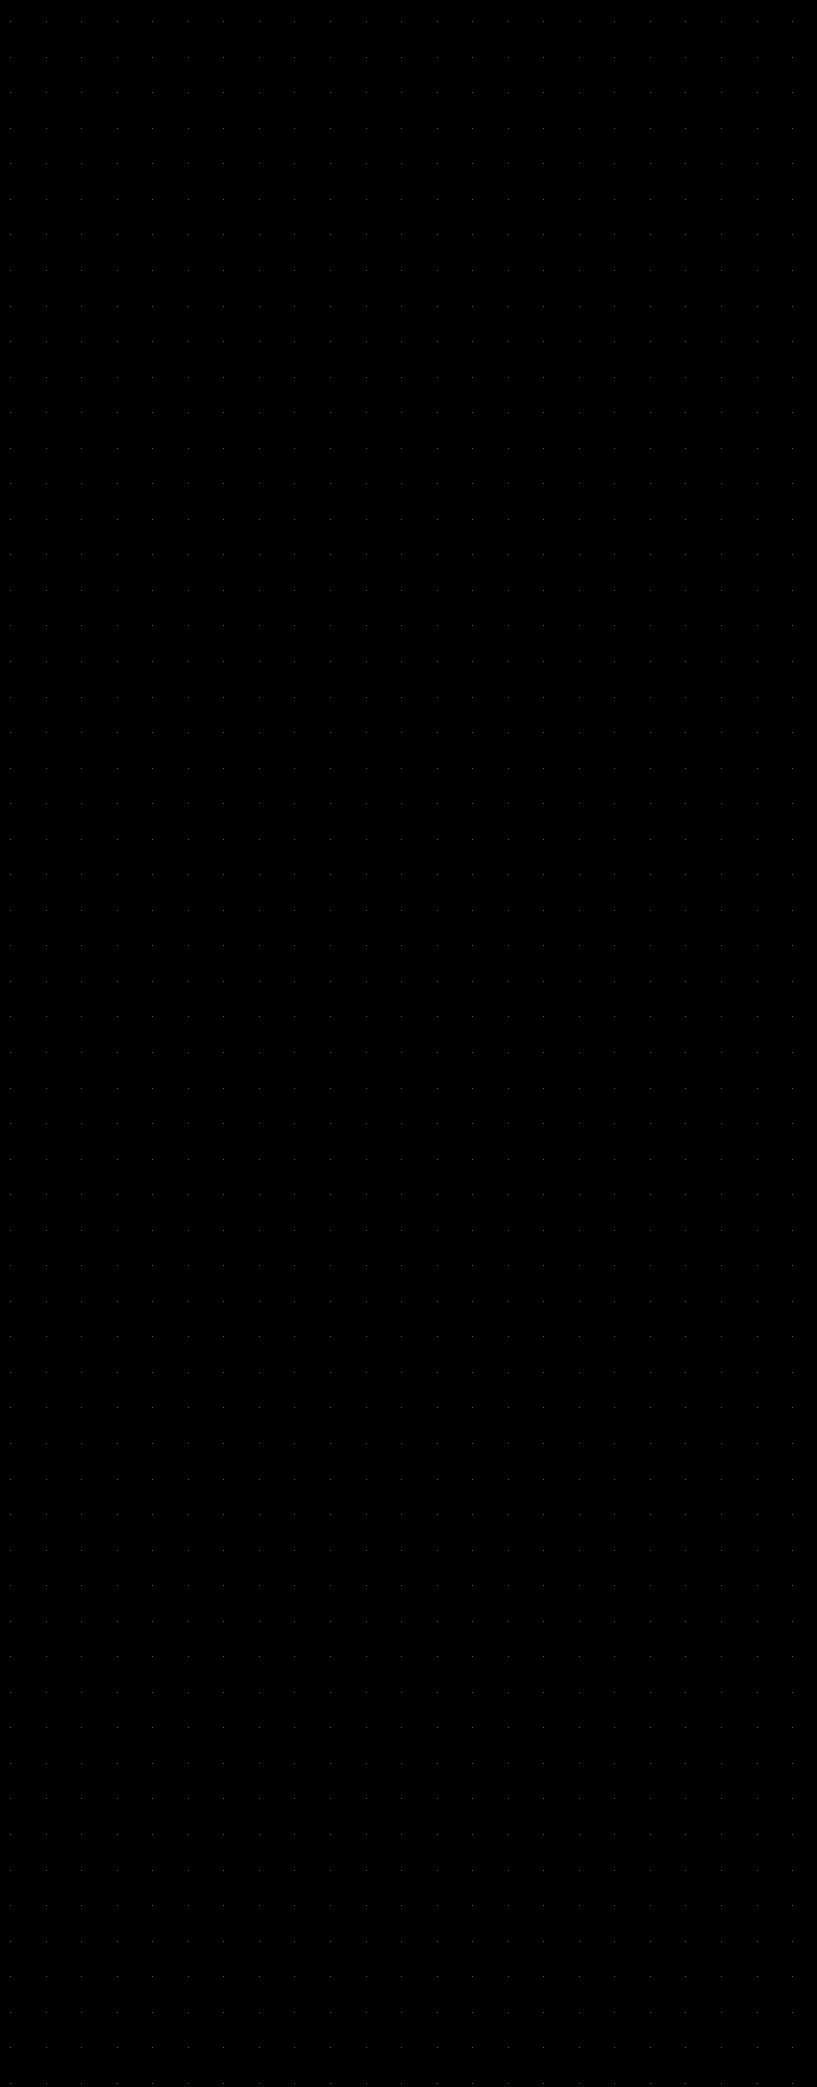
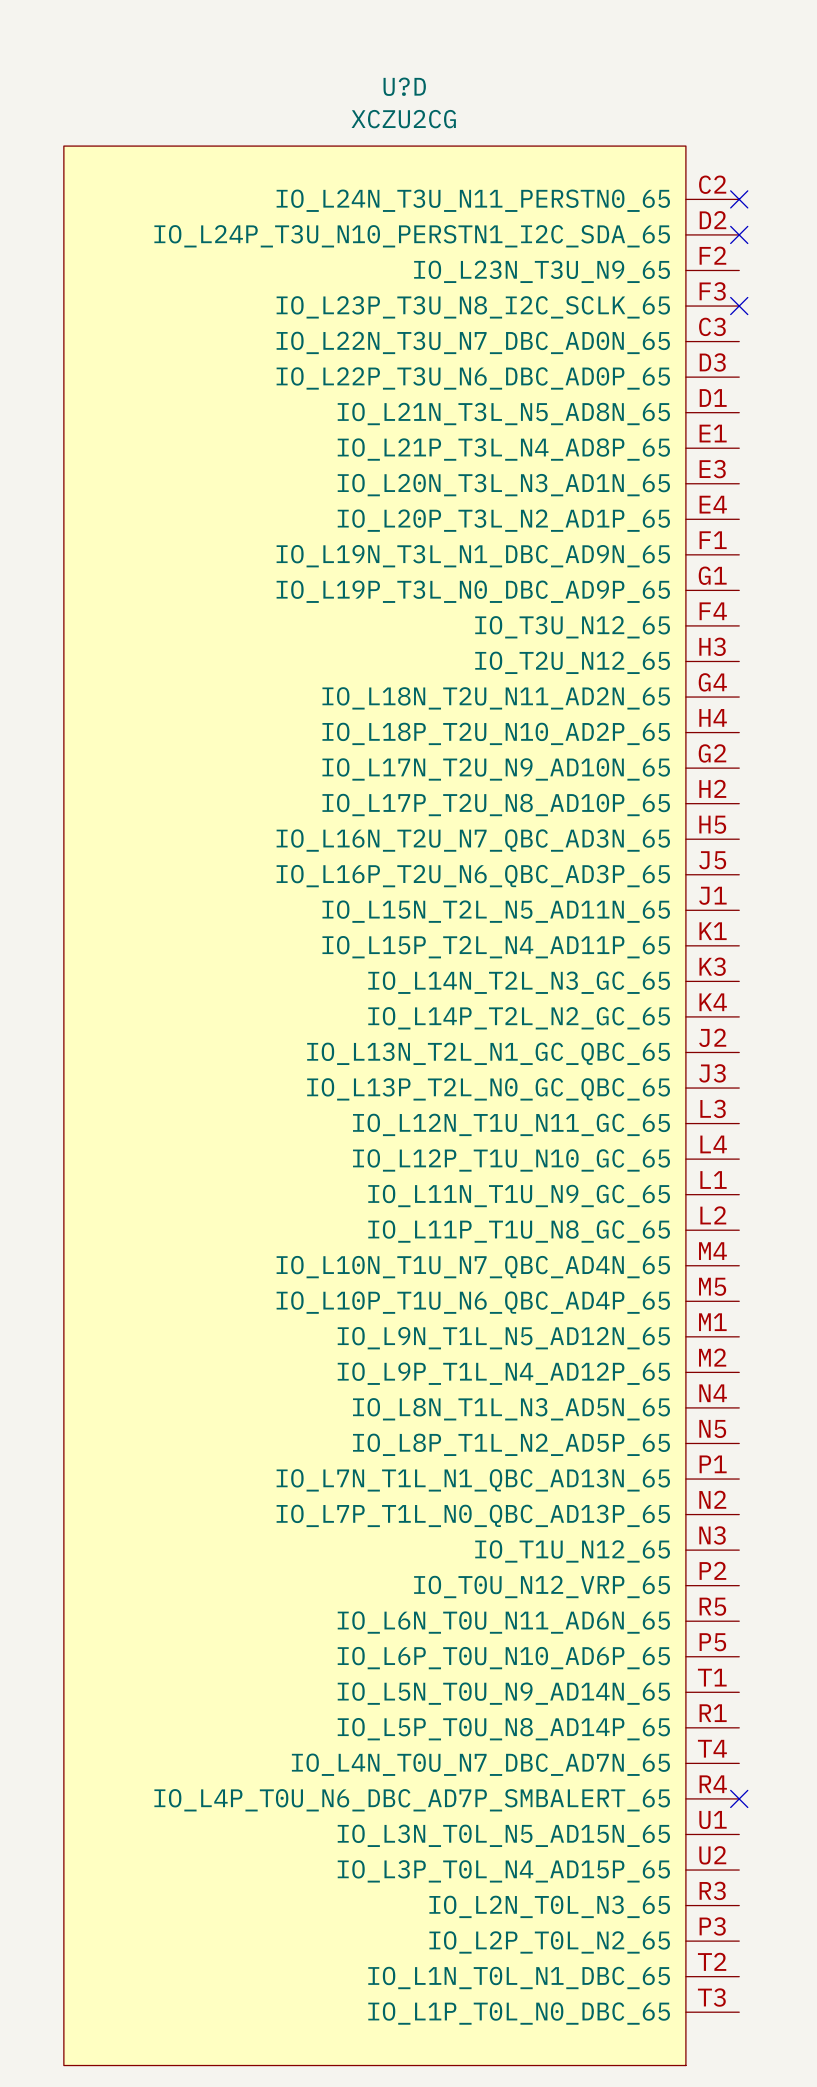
no-connect mark: none -> (739, 199)
no-connect mark: none -> (739, 234)
no-connect mark: none -> (739, 306)
U?D: none -> XCZU2CG (401, 1105)
no-connect mark: none -> (739, 1798)

